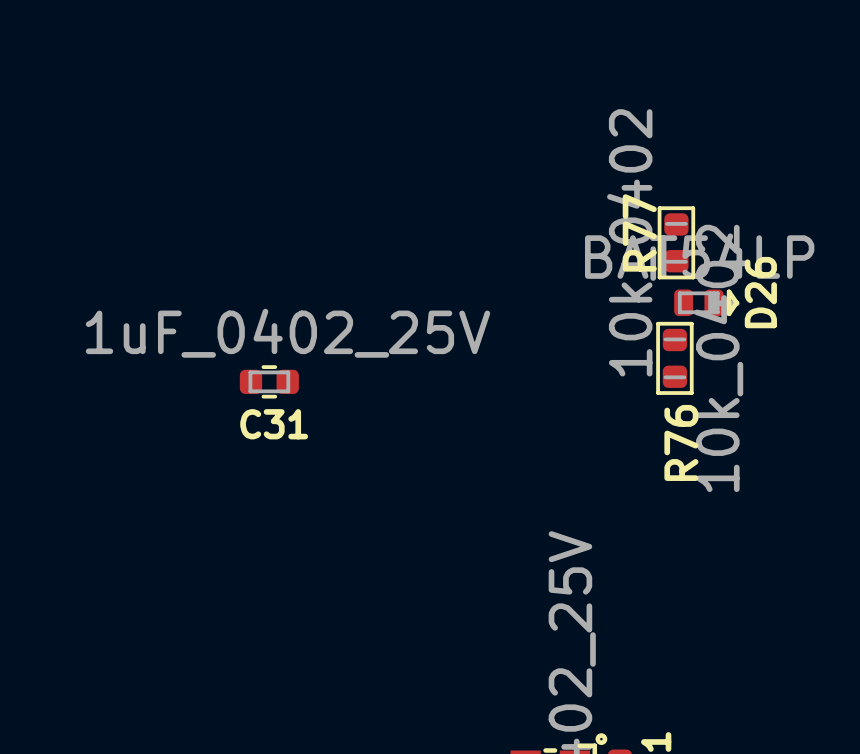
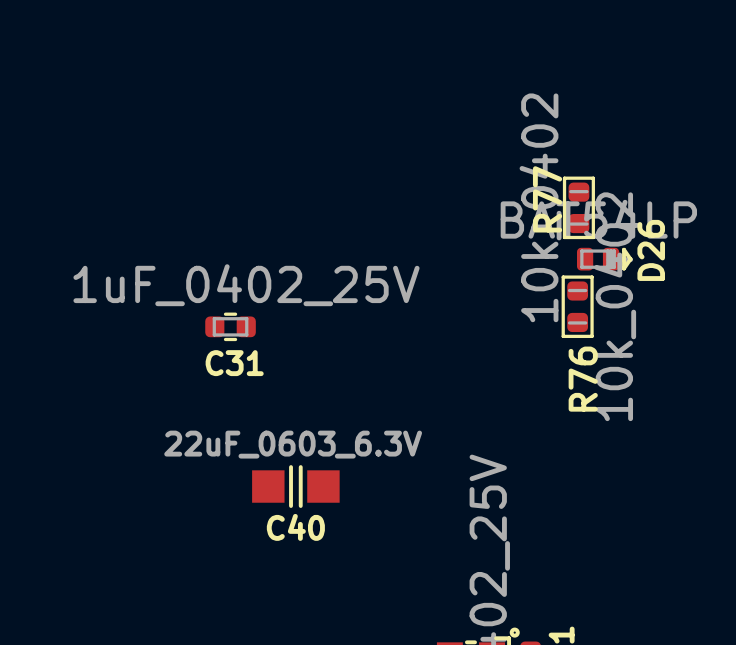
C40: none -> 22uF_0603_6.3V (295, 486)

